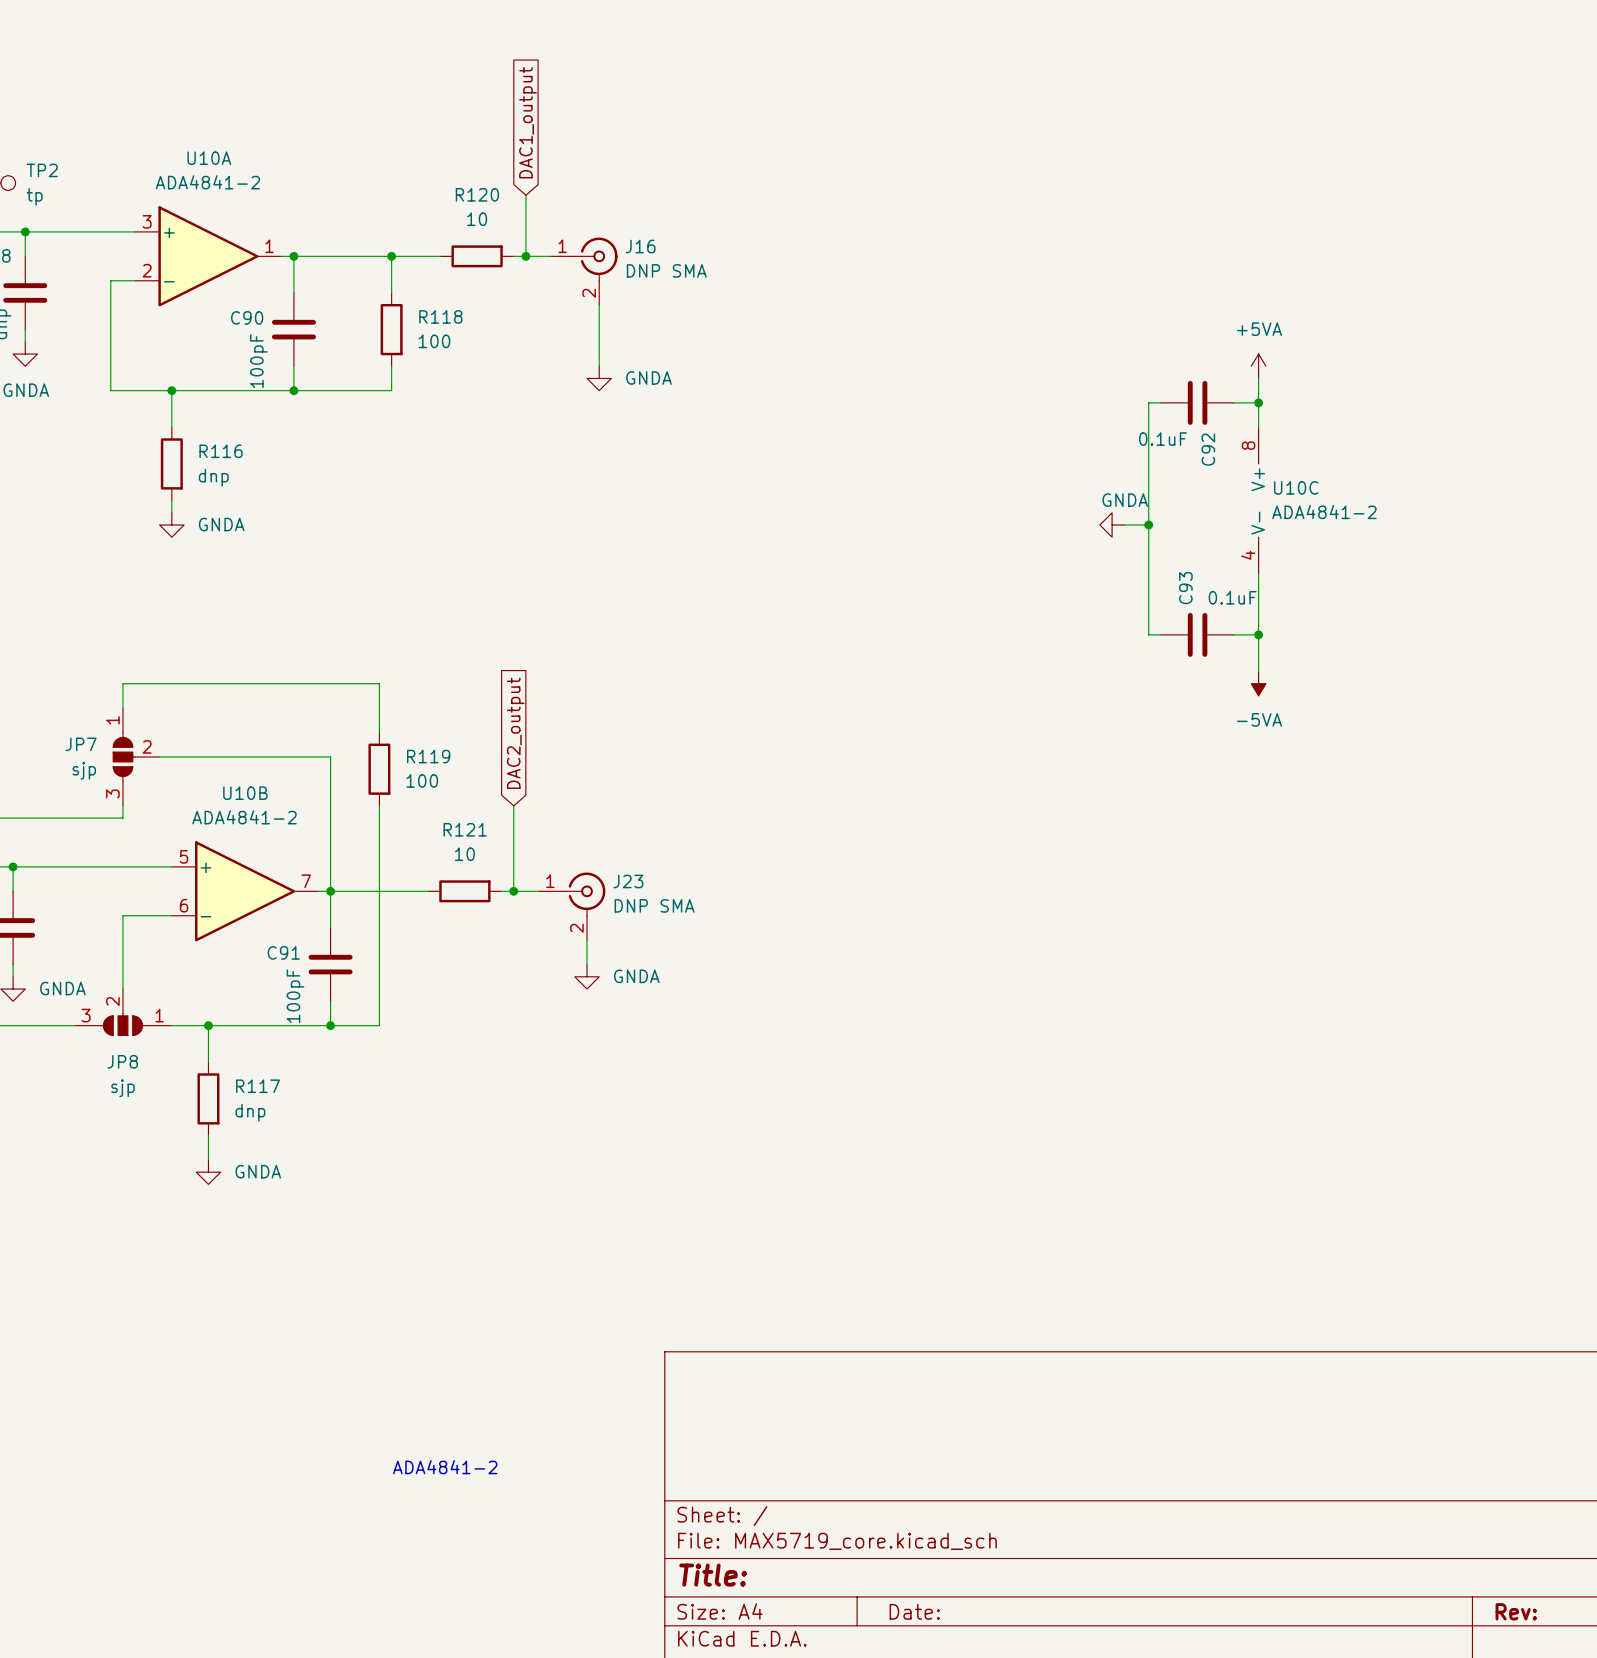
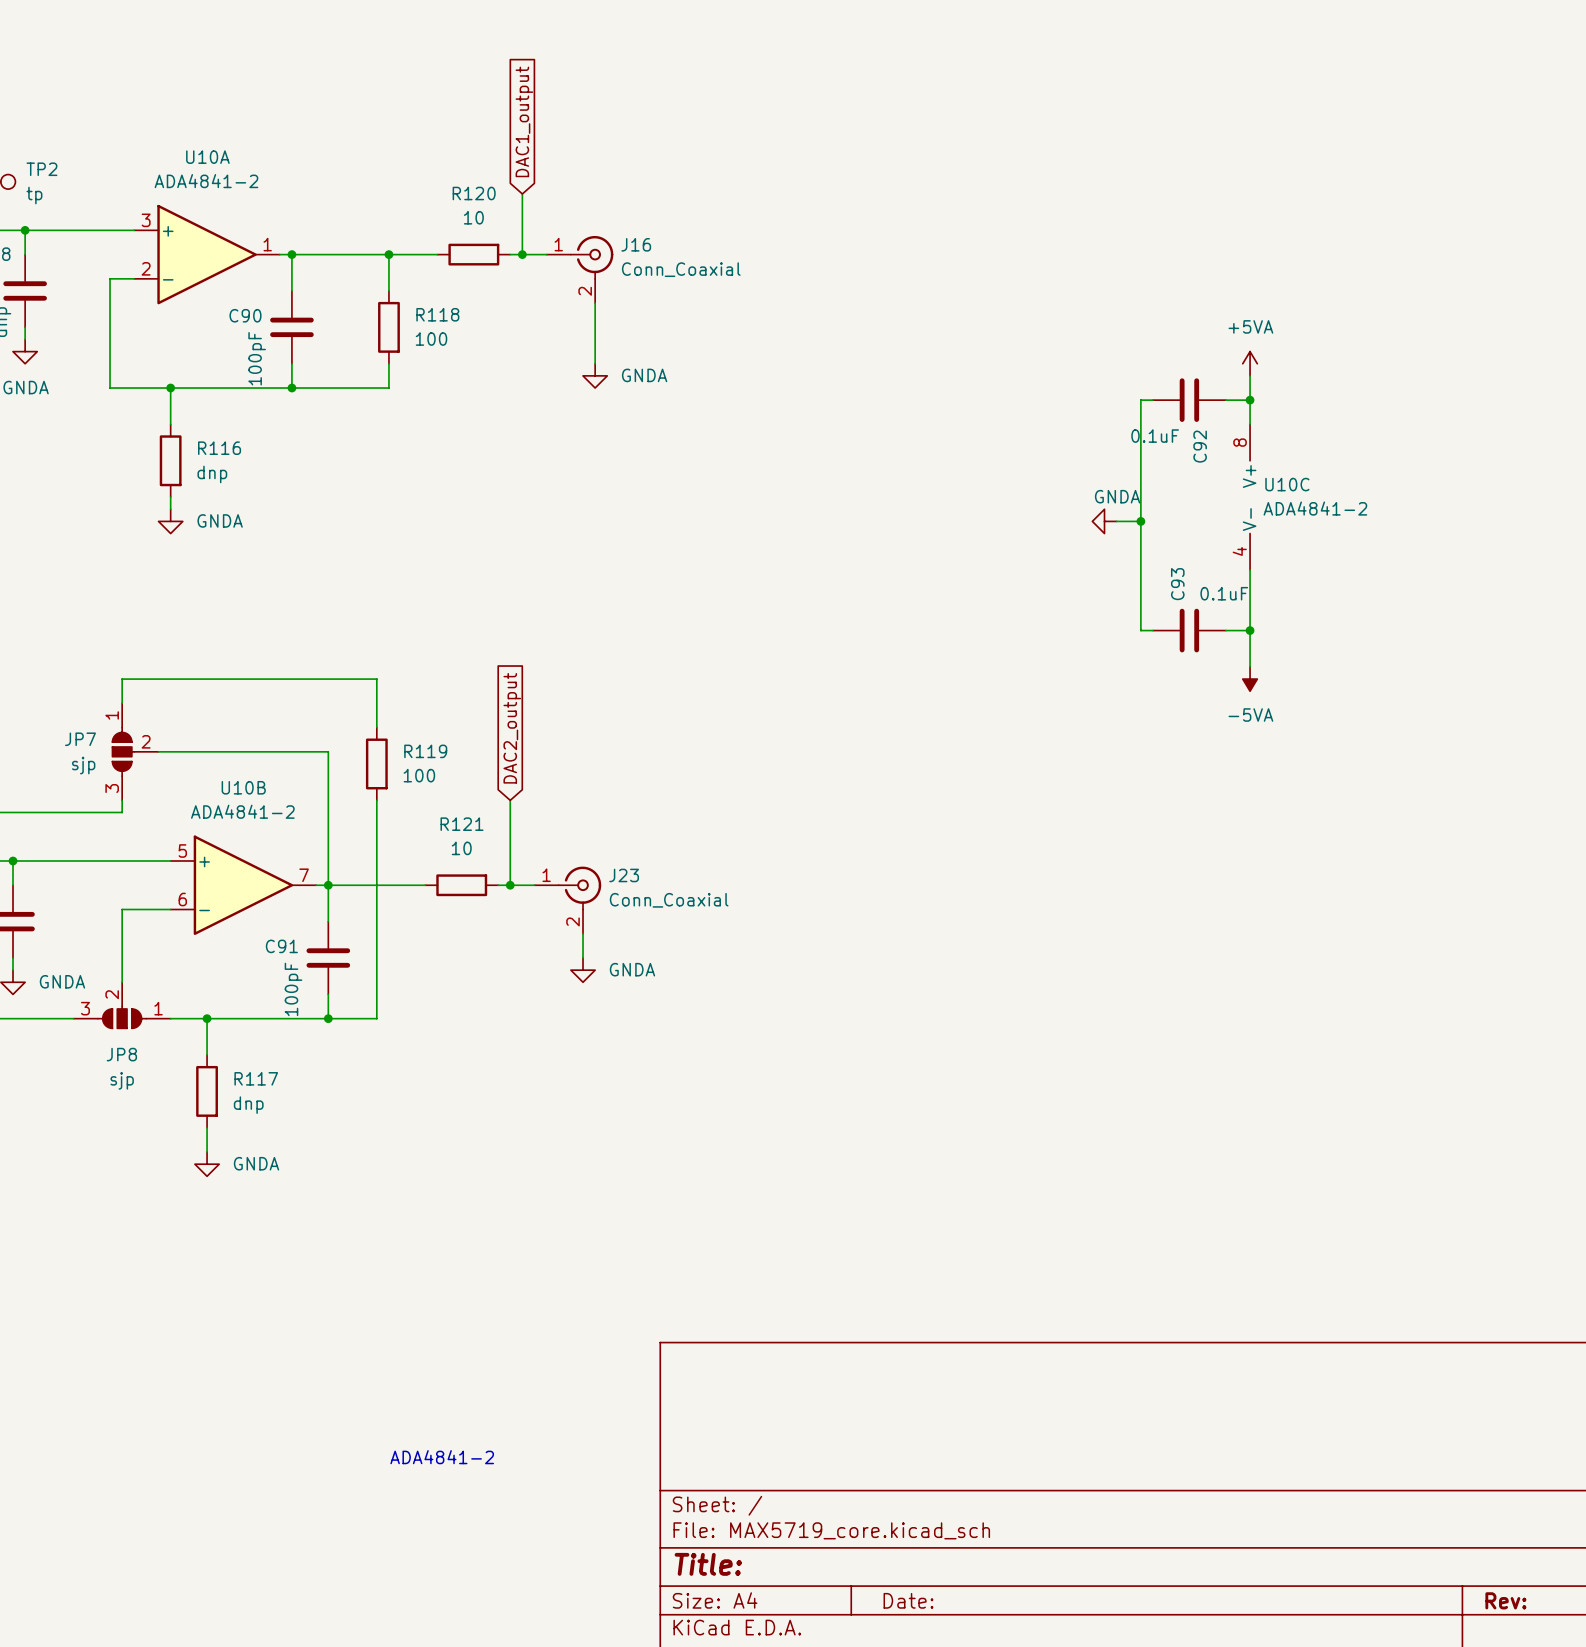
J16 value: DNP SMA (666, 270) -> Conn_Coaxial (681, 269)
J23 value: DNP SMA (654, 905) -> Conn_Coaxial (669, 900)

